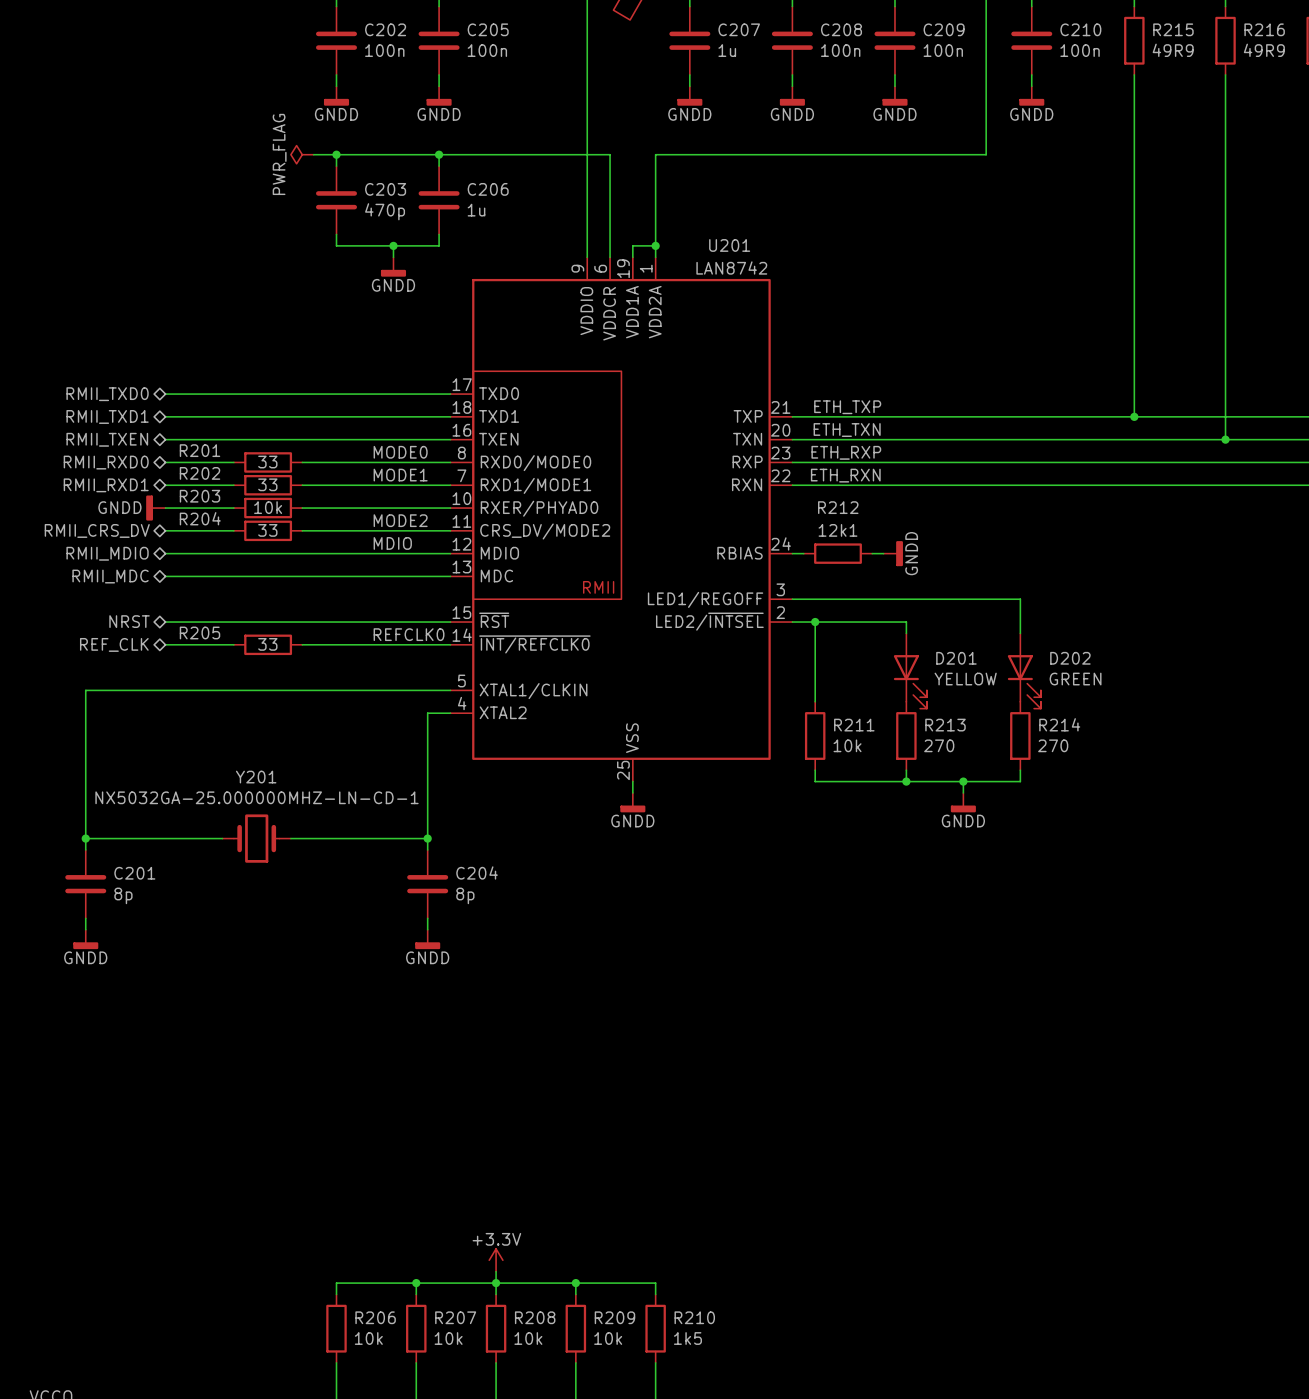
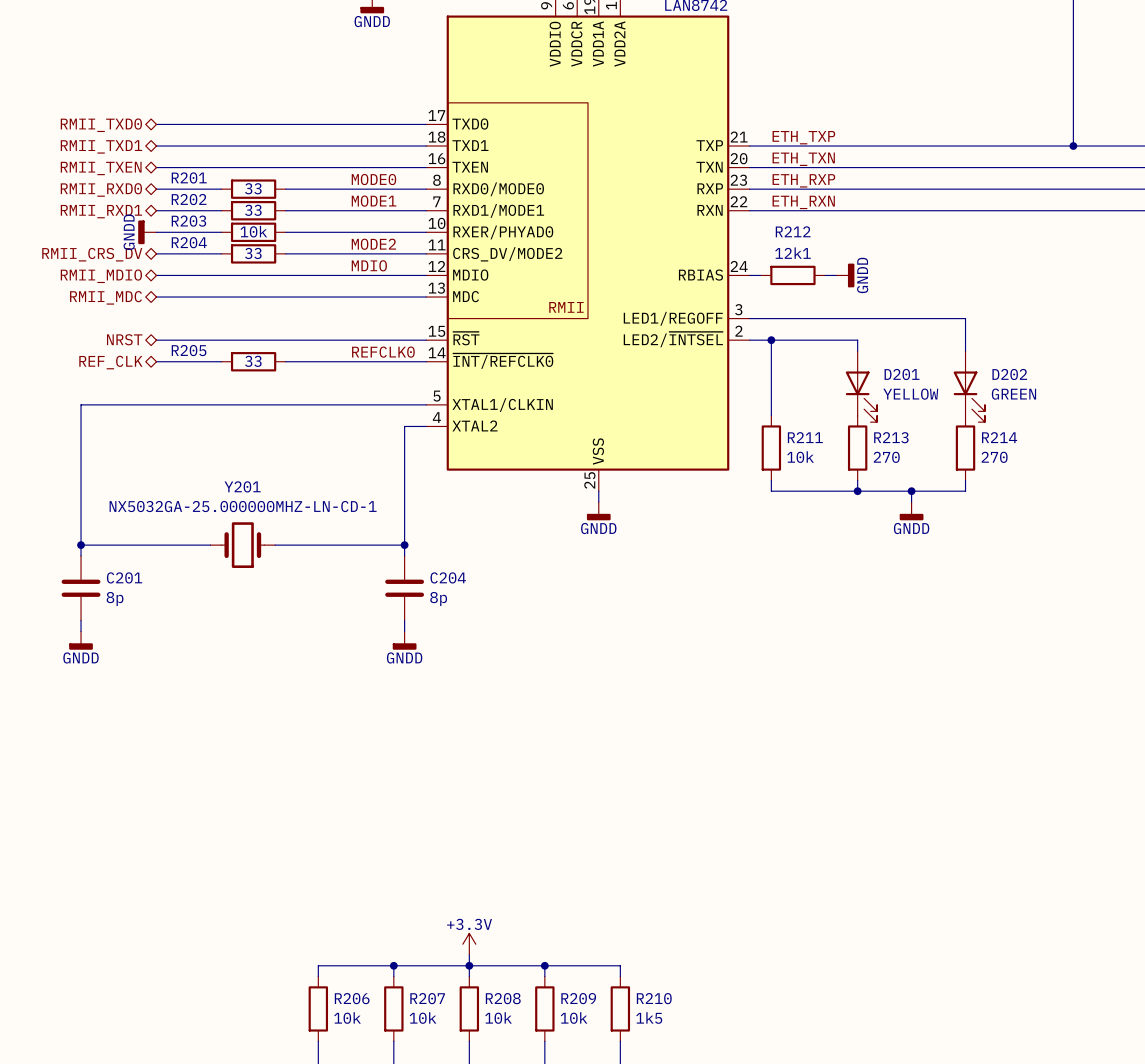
power symbol text rotation: 0° (119, 507) -> 90° counterclockwise (129, 232)

